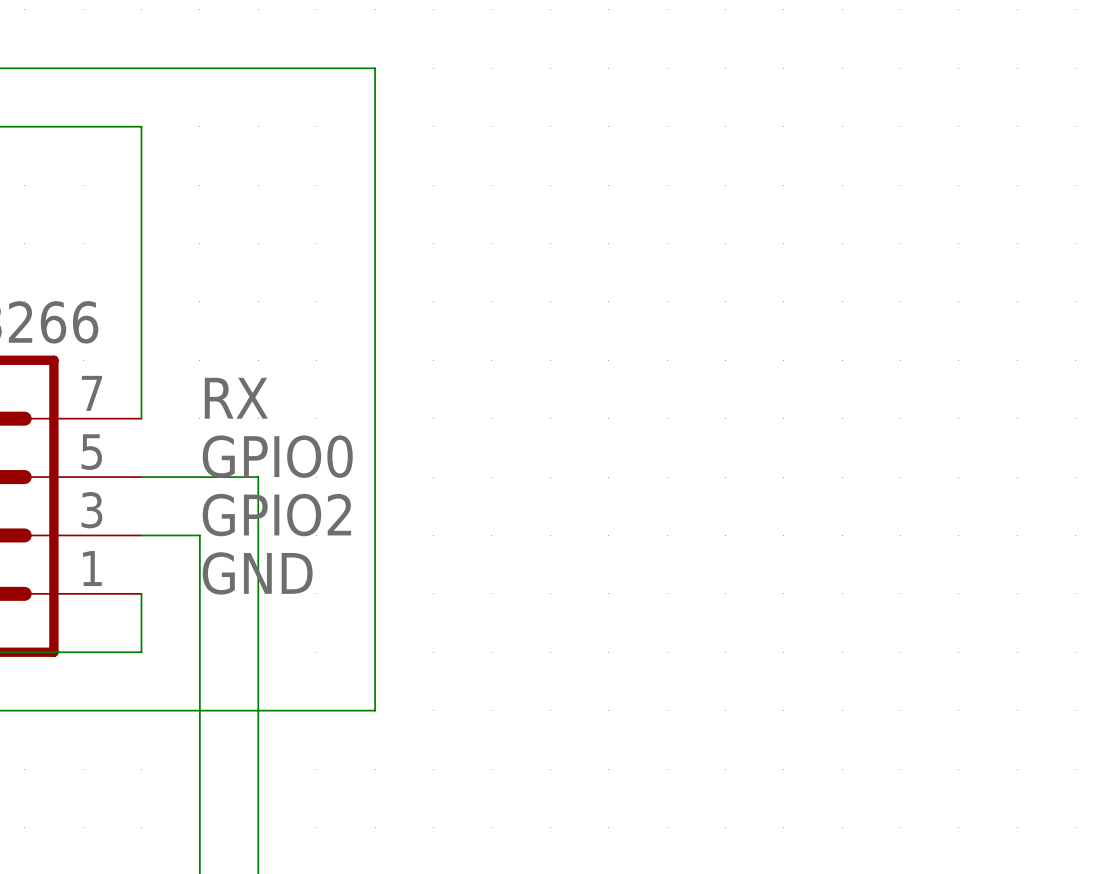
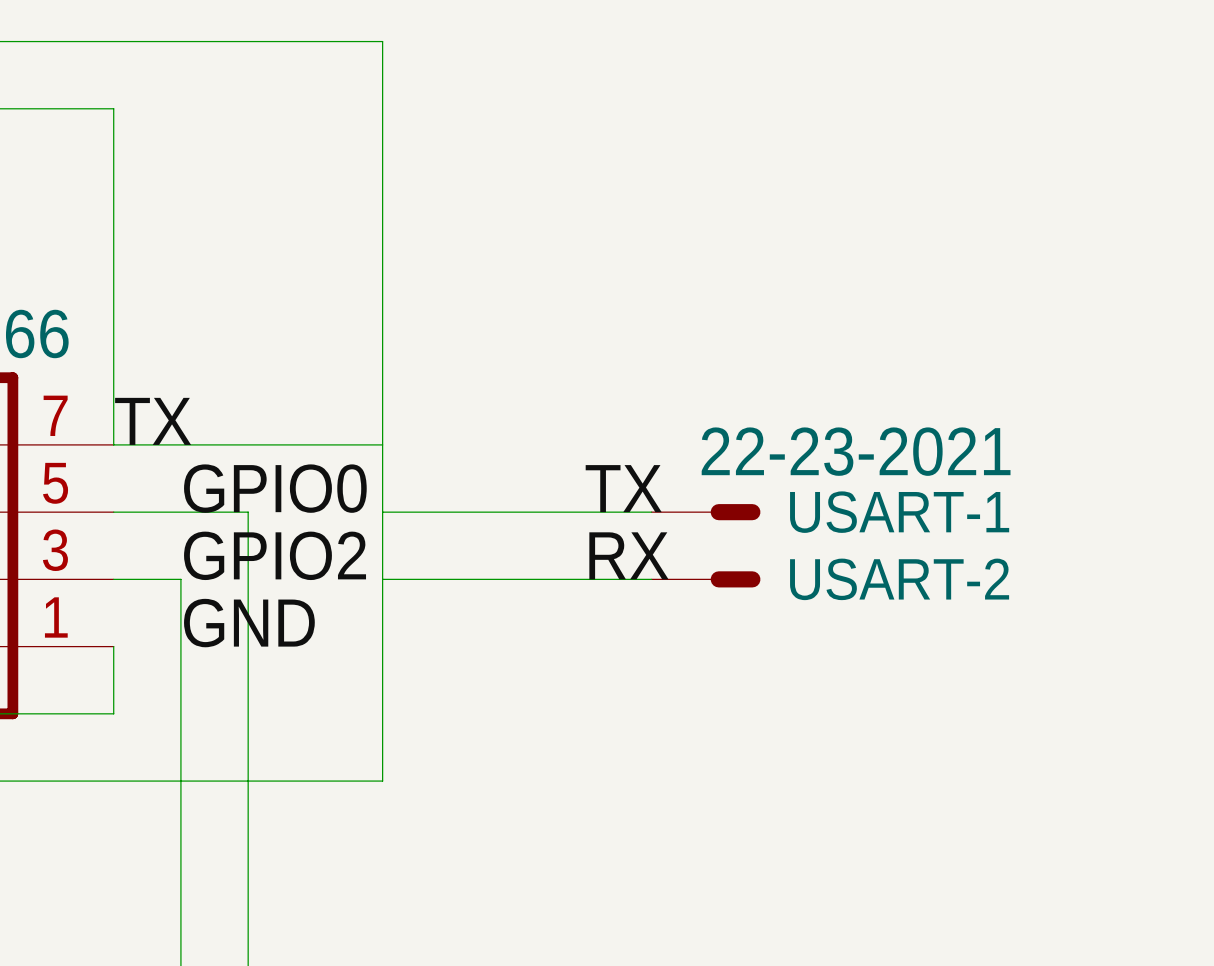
label: none -> TX (153, 421)
label: RX (236, 398) -> none
wire: none -> (113, 444) (382, 444)
label: none -> TX (623, 488)
wire: none -> (382, 512) (651, 512)
USART-1: none -> 22-23-2021 (705, 512)
label: none -> RX (628, 555)
wire: none -> (382, 579) (651, 579)
USART-2: none -> (705, 579)

